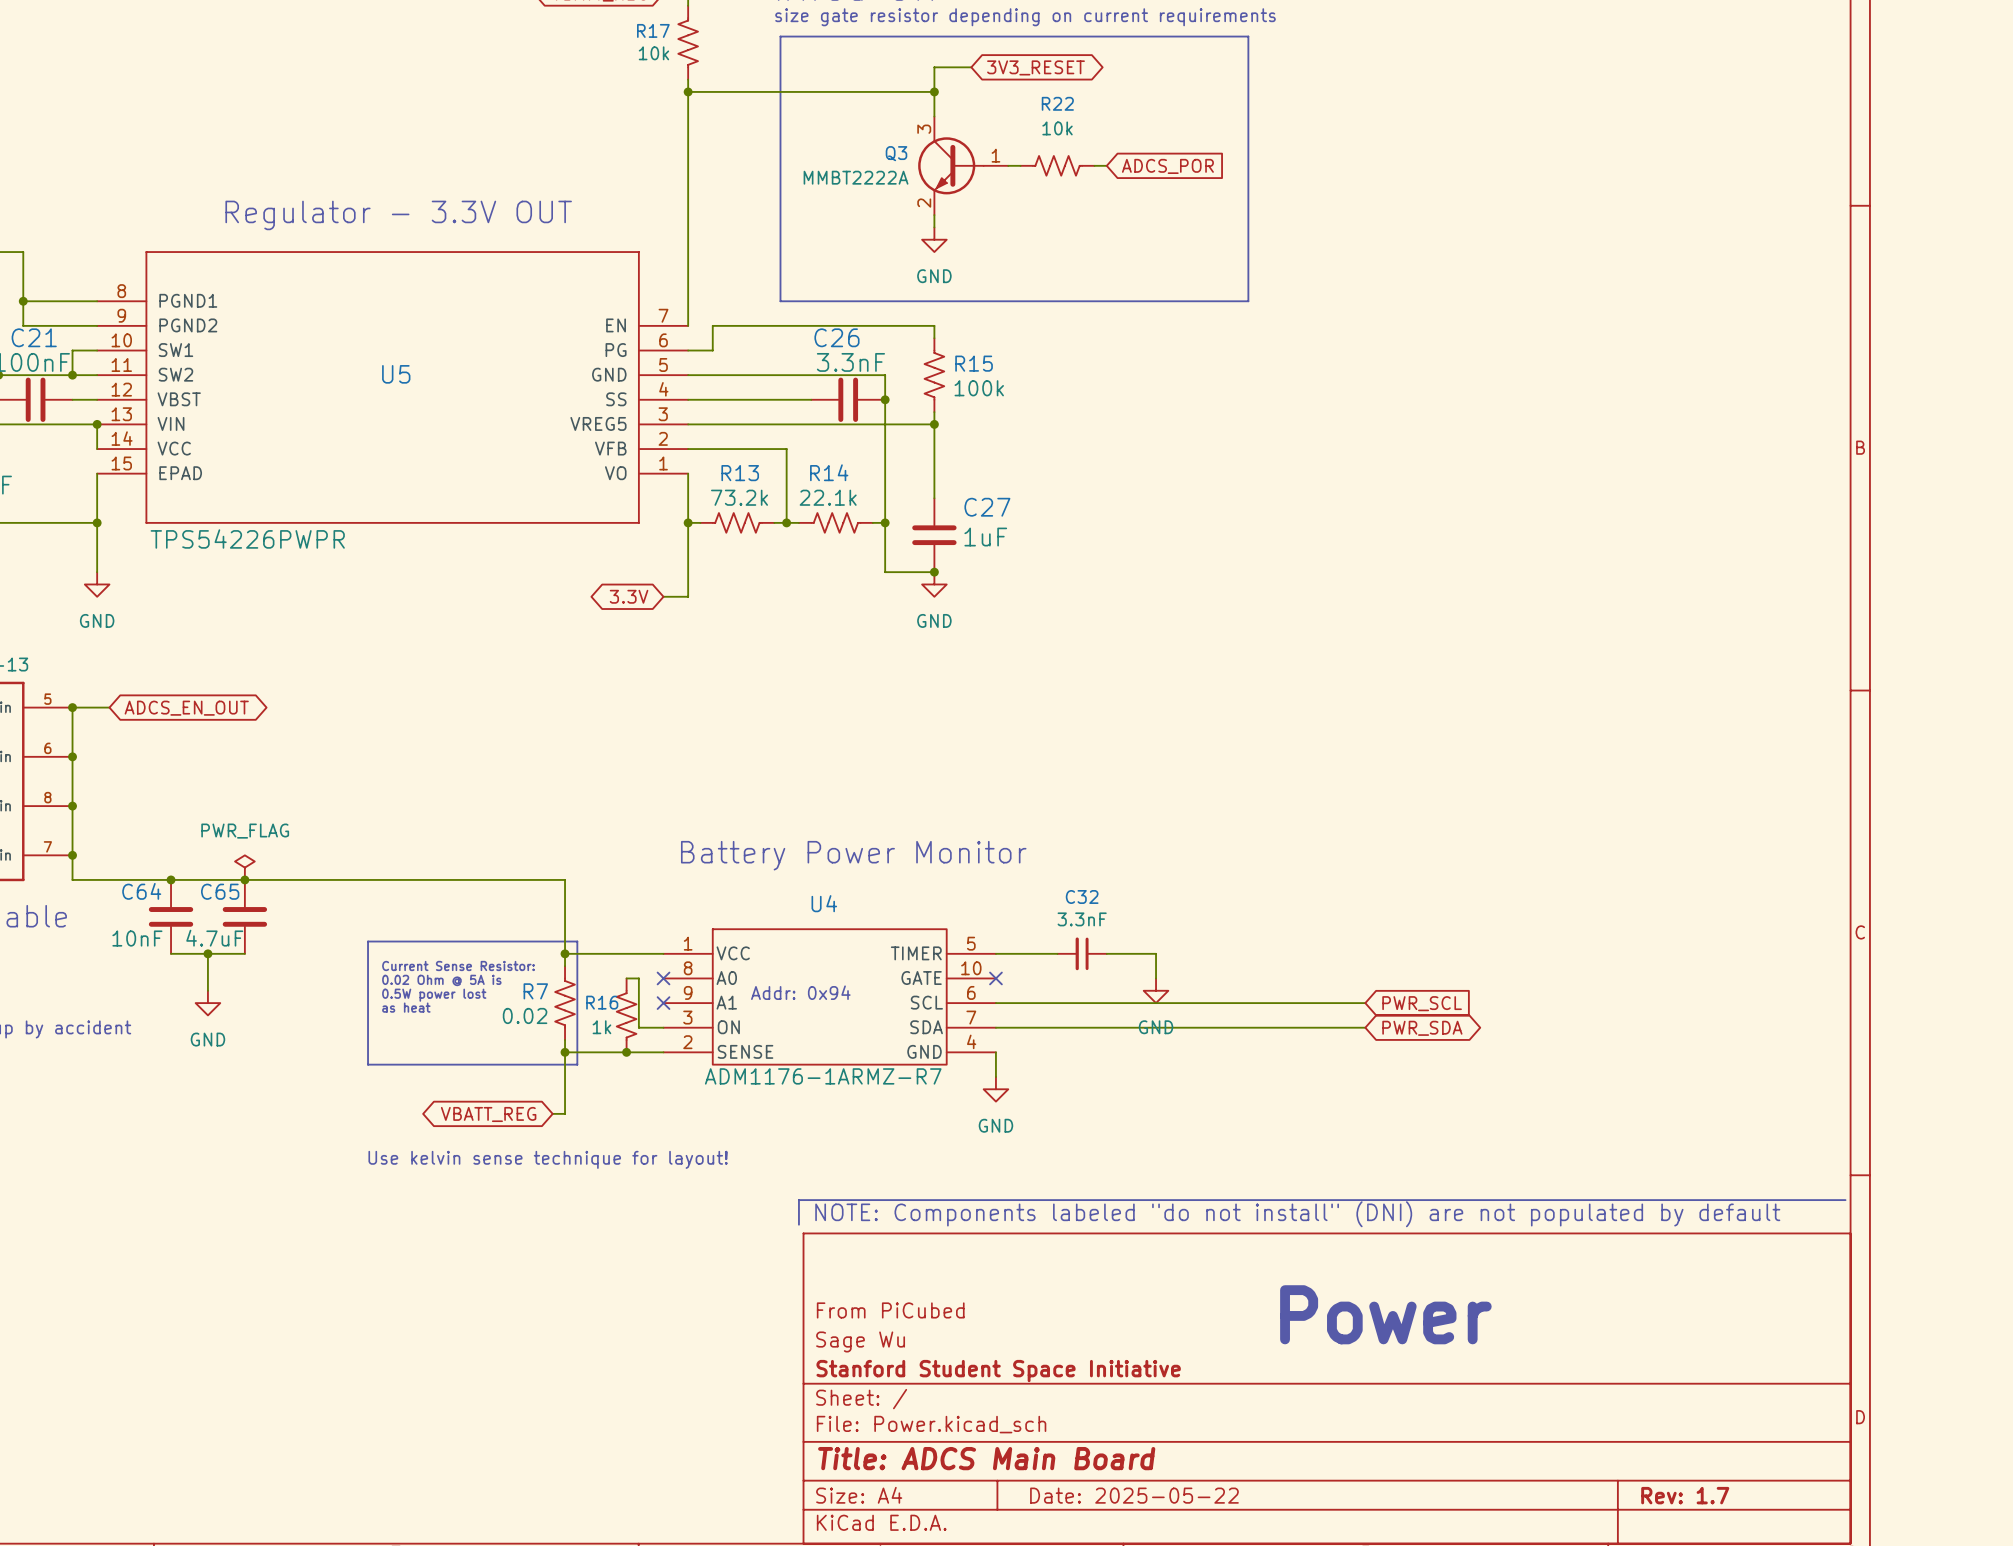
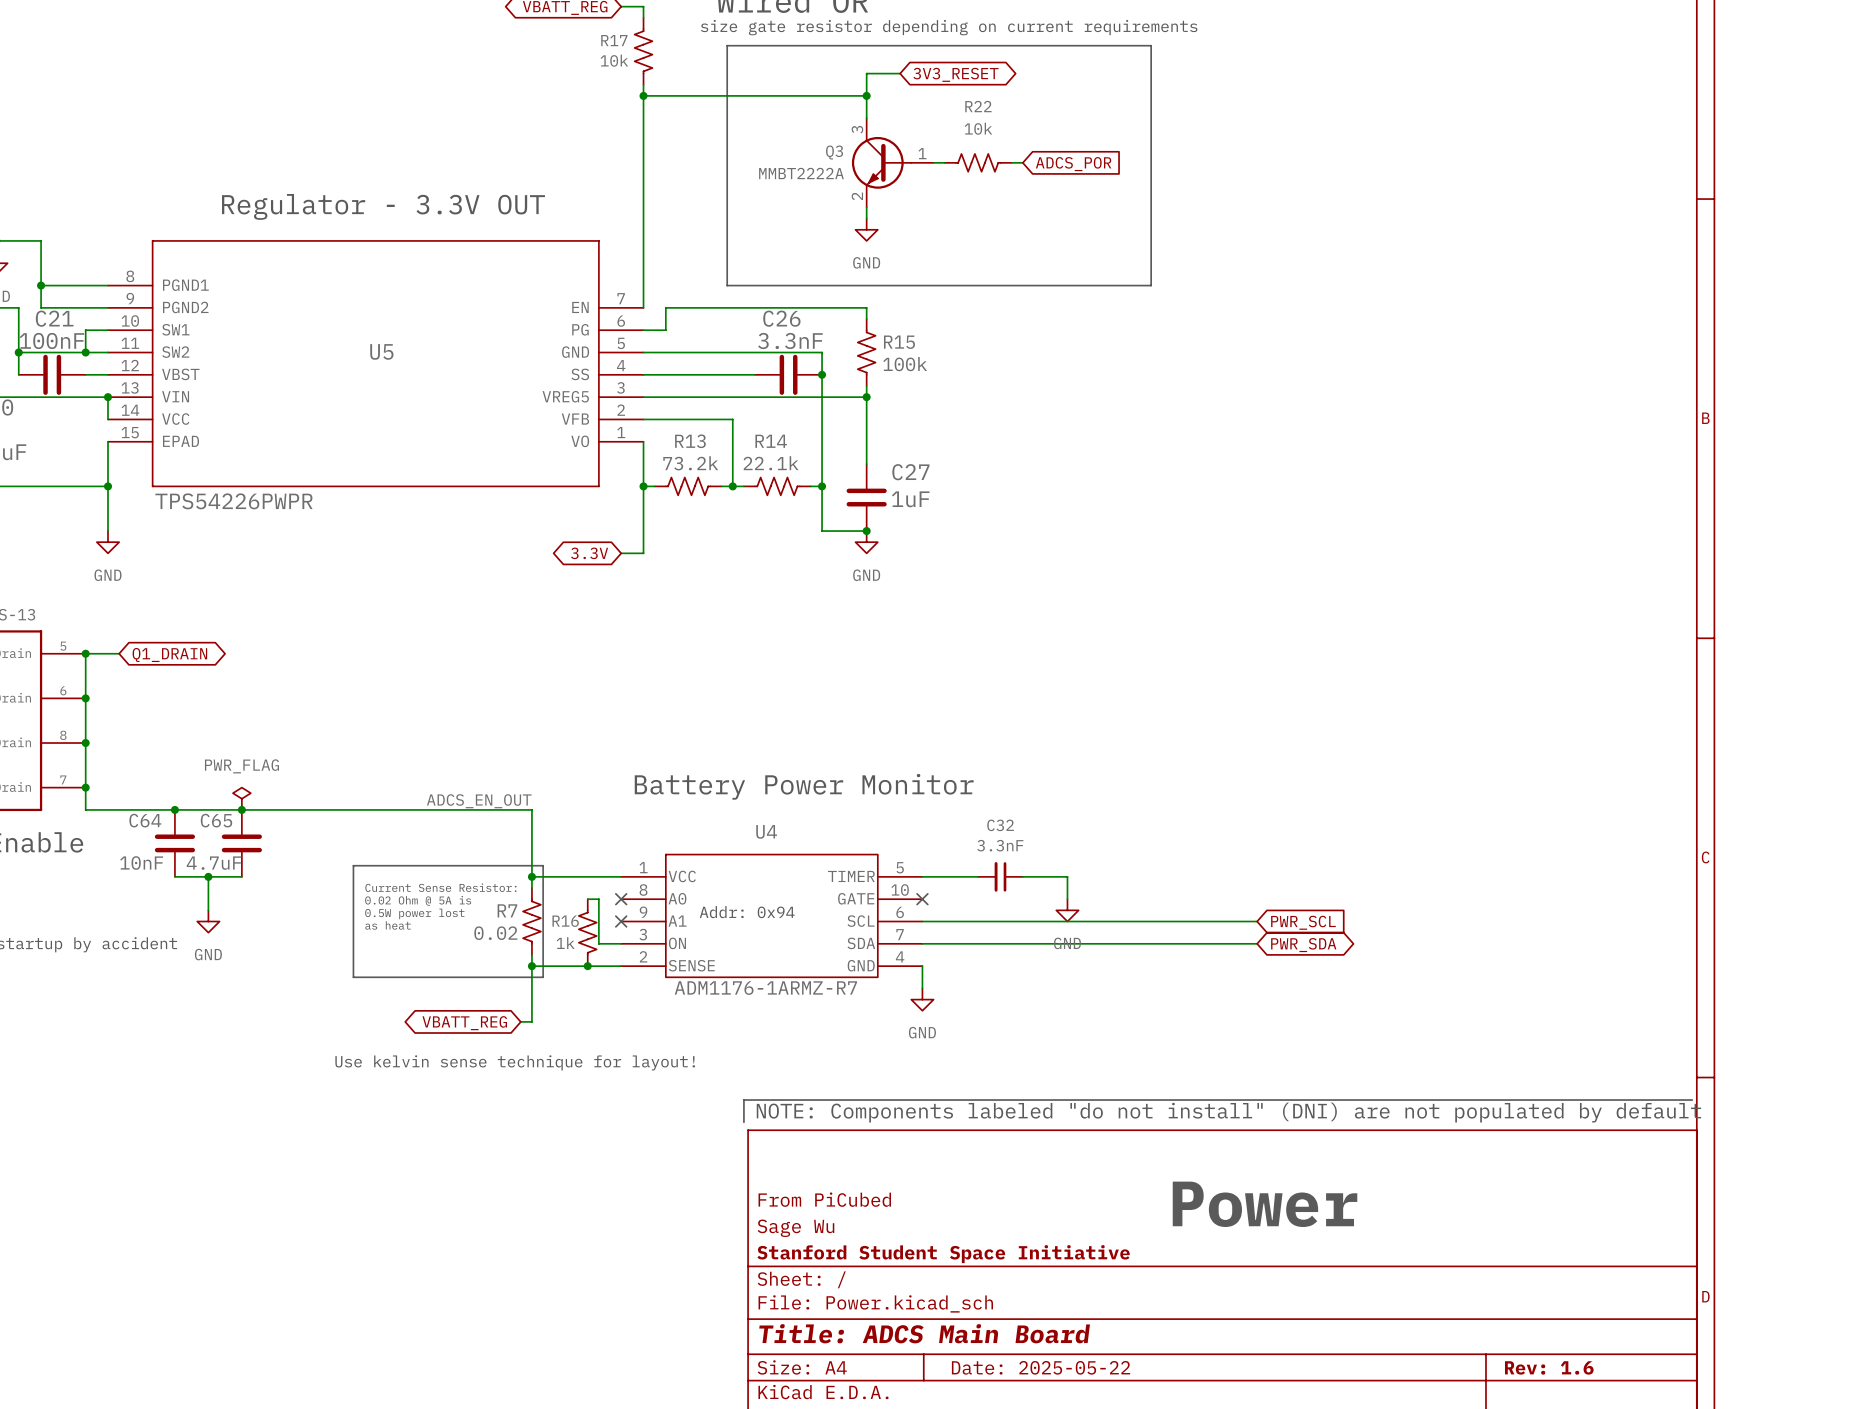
global label: ADCS_EN_OUT (186, 708) -> Q1_DRAIN (169, 655)
label: none -> ADCS_EN_OUT (479, 801)
title block: Rev: 1.7 (1685, 1495) -> Rev: 1.6 (1549, 1367)

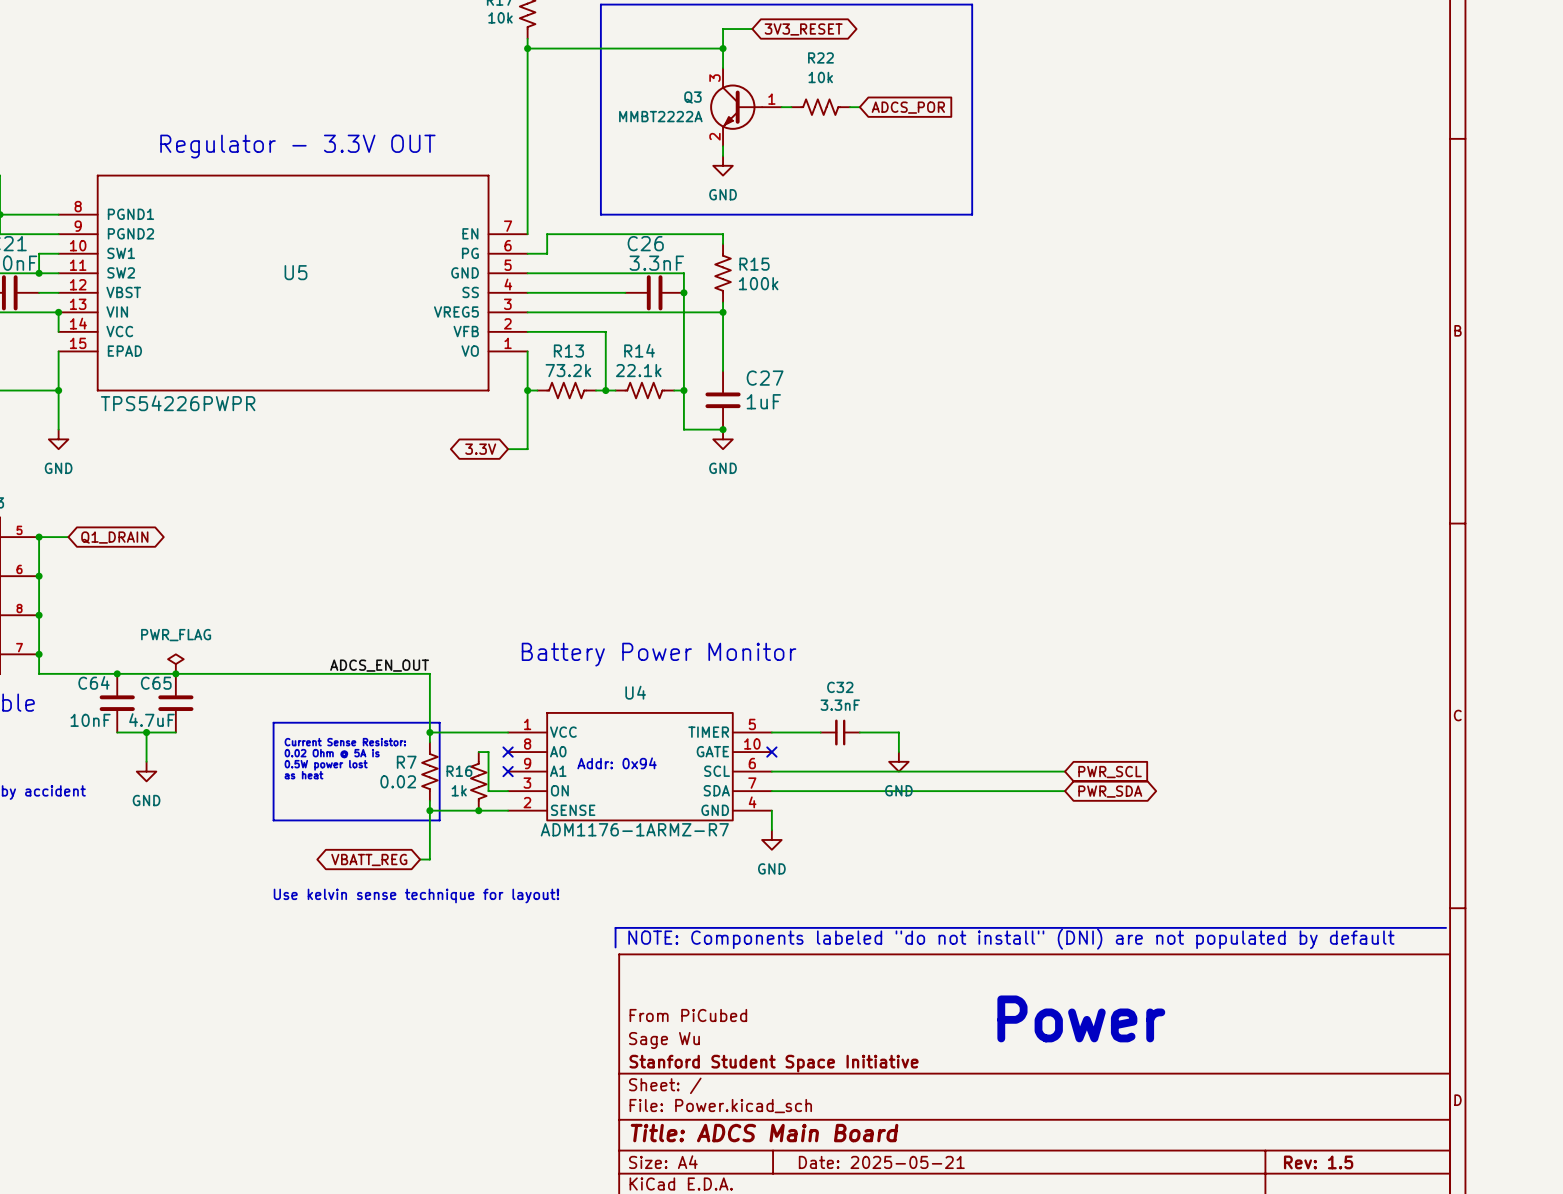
title block: Date: 2025-05-22 (1041, 1367) -> Date: 2025-05-21 (881, 1162)
title block: Rev: 1.6 (1549, 1367) -> Rev: 1.5 (1318, 1162)

